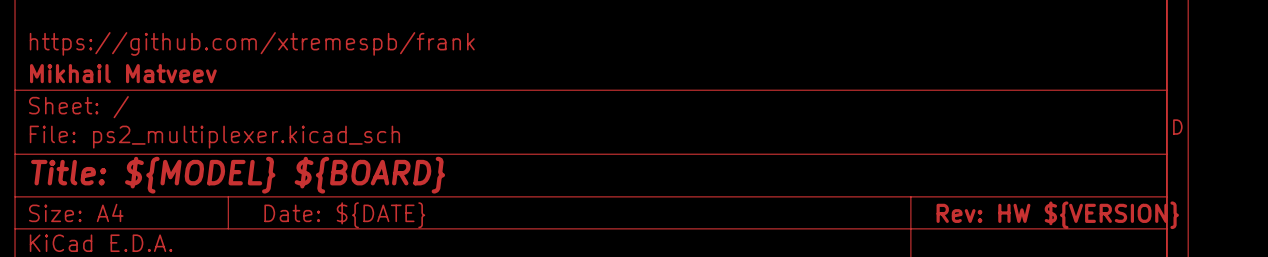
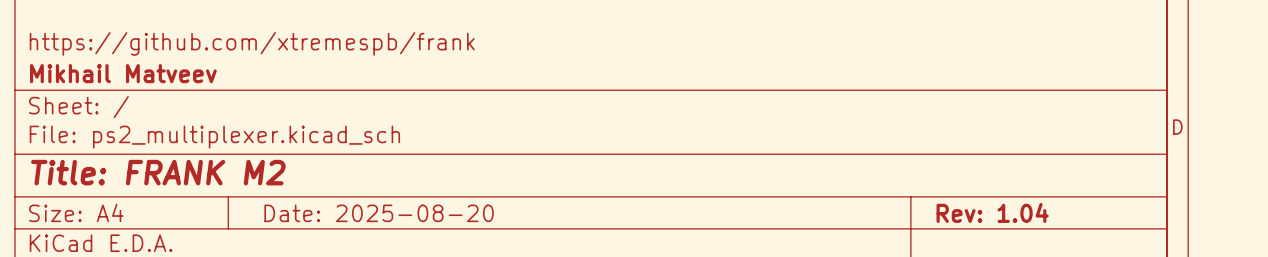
title block: Title: ${MODEL} ${BOARD} (238, 175) -> Title: FRANK M2 (158, 172)
title block: Date: ${DATE} (344, 215) -> Date: 2025-08-20 (379, 213)
title block: Rev: HW ${VERSION} (1057, 215) -> Rev: 1.04 (992, 212)

